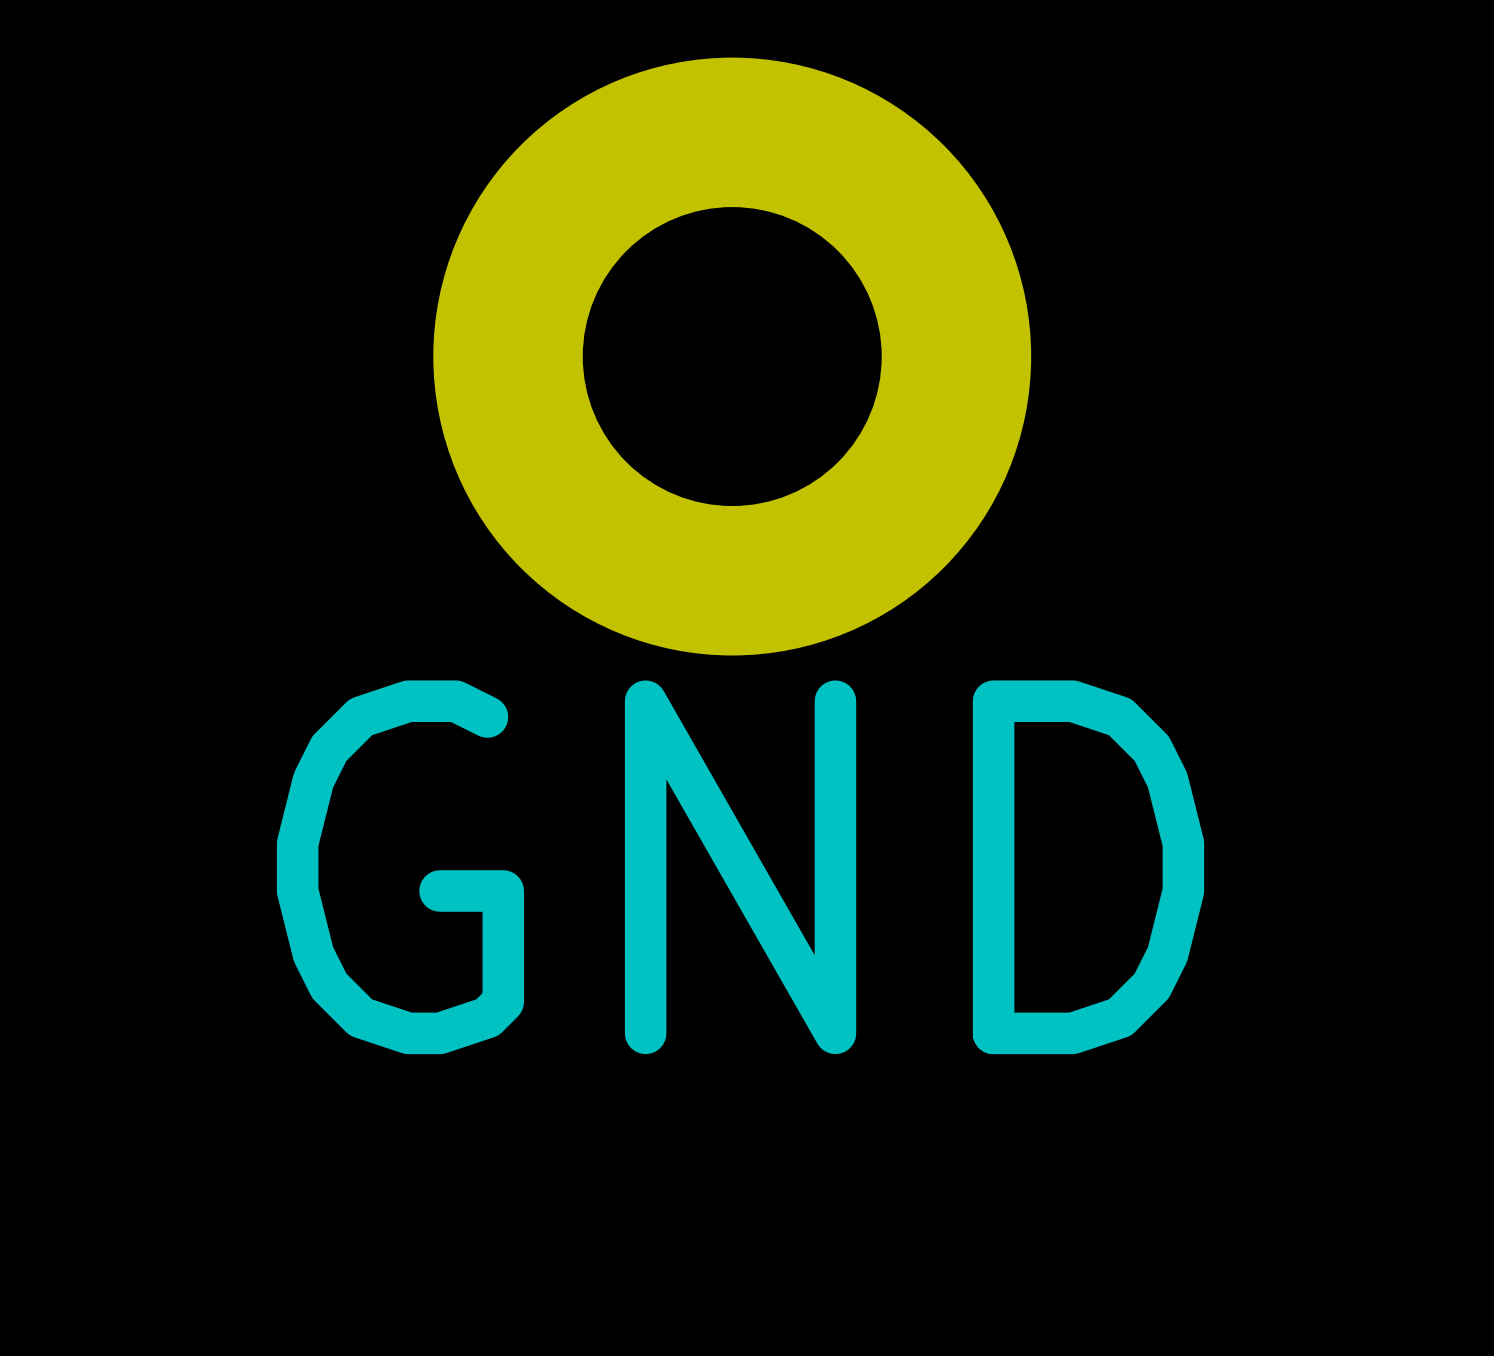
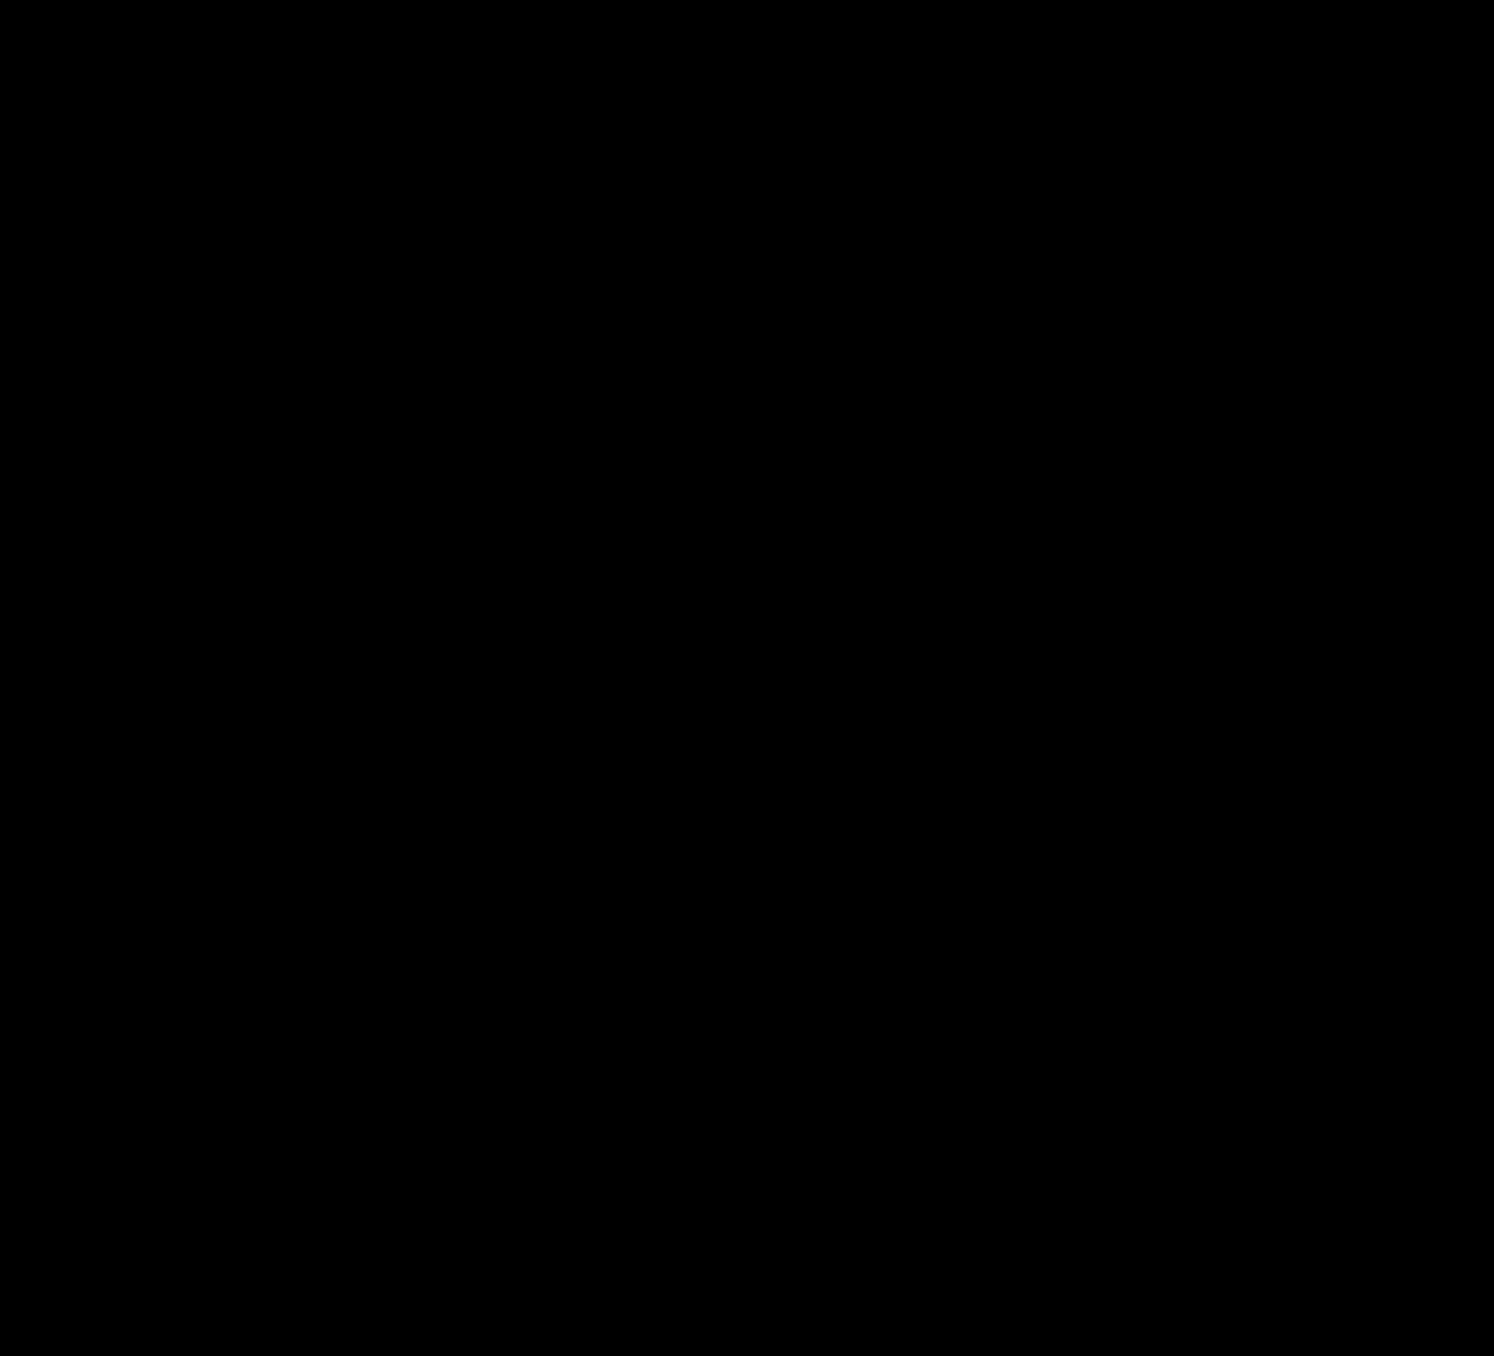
part: (732, 356) -> none
text: GND (740, 867) -> none

